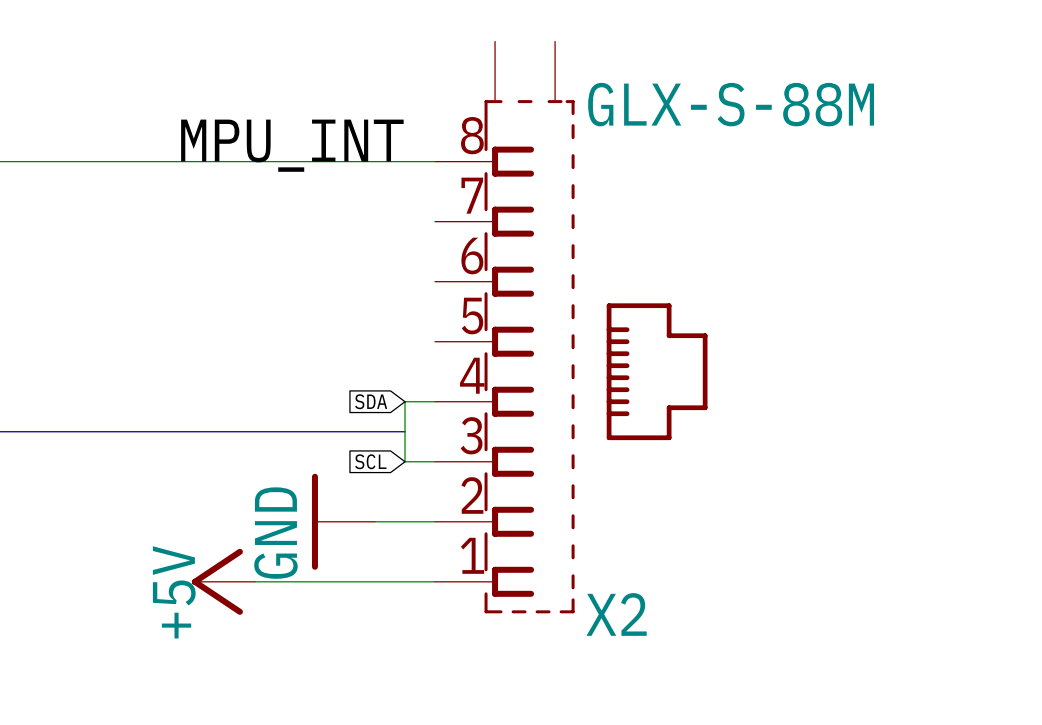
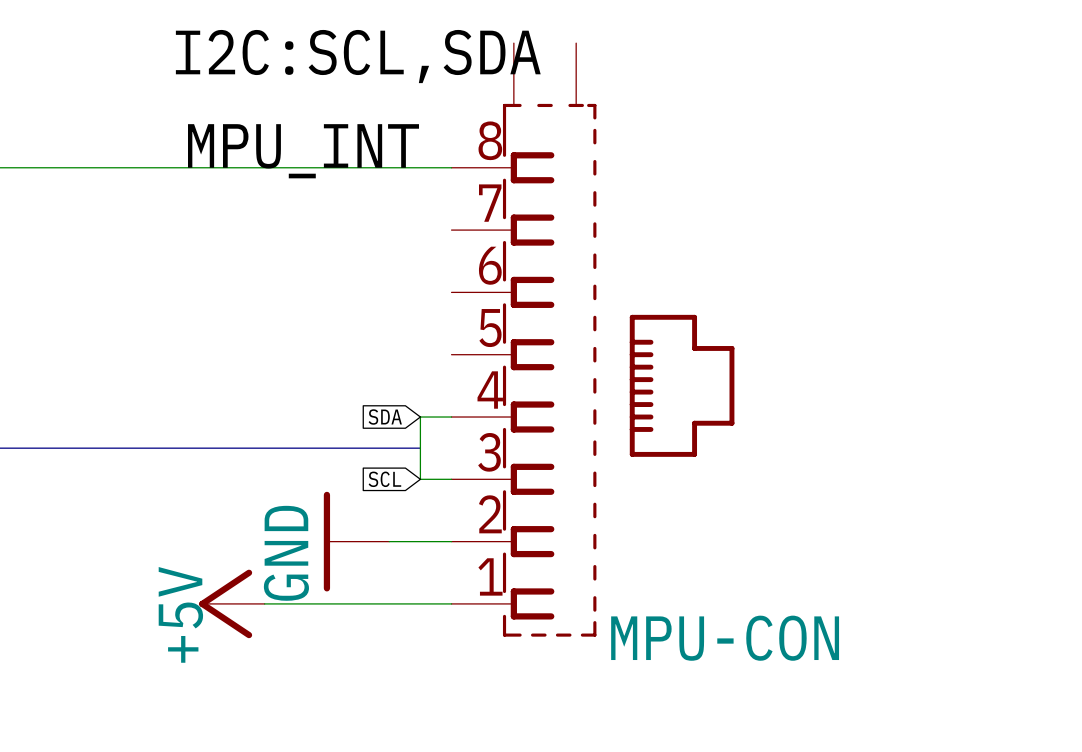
label: none -> I2C:SCL,SDA (358, 56)
X2 value: GLX-S-88M (731, 104) -> none
X2 name: X2 (616, 614) -> MPU-CON (725, 638)

